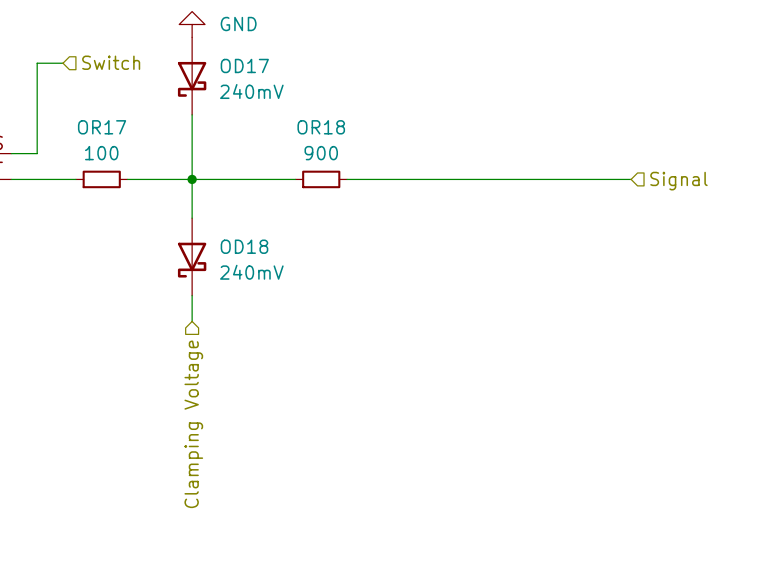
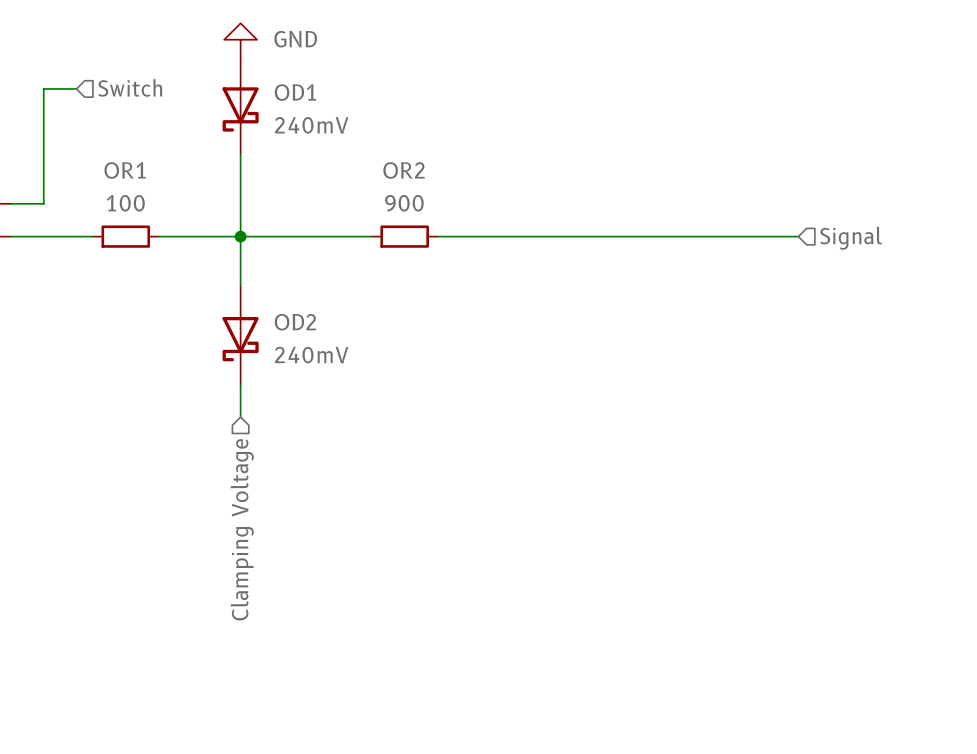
OD17 name: OD17 (244, 65) -> OD1 (295, 92)
OR17 name: OR17 (102, 127) -> OR1 (125, 170)
OR18 name: OR18 (321, 127) -> OR2 (404, 170)
OD18 name: OD18 (244, 246) -> OD2 (295, 322)

